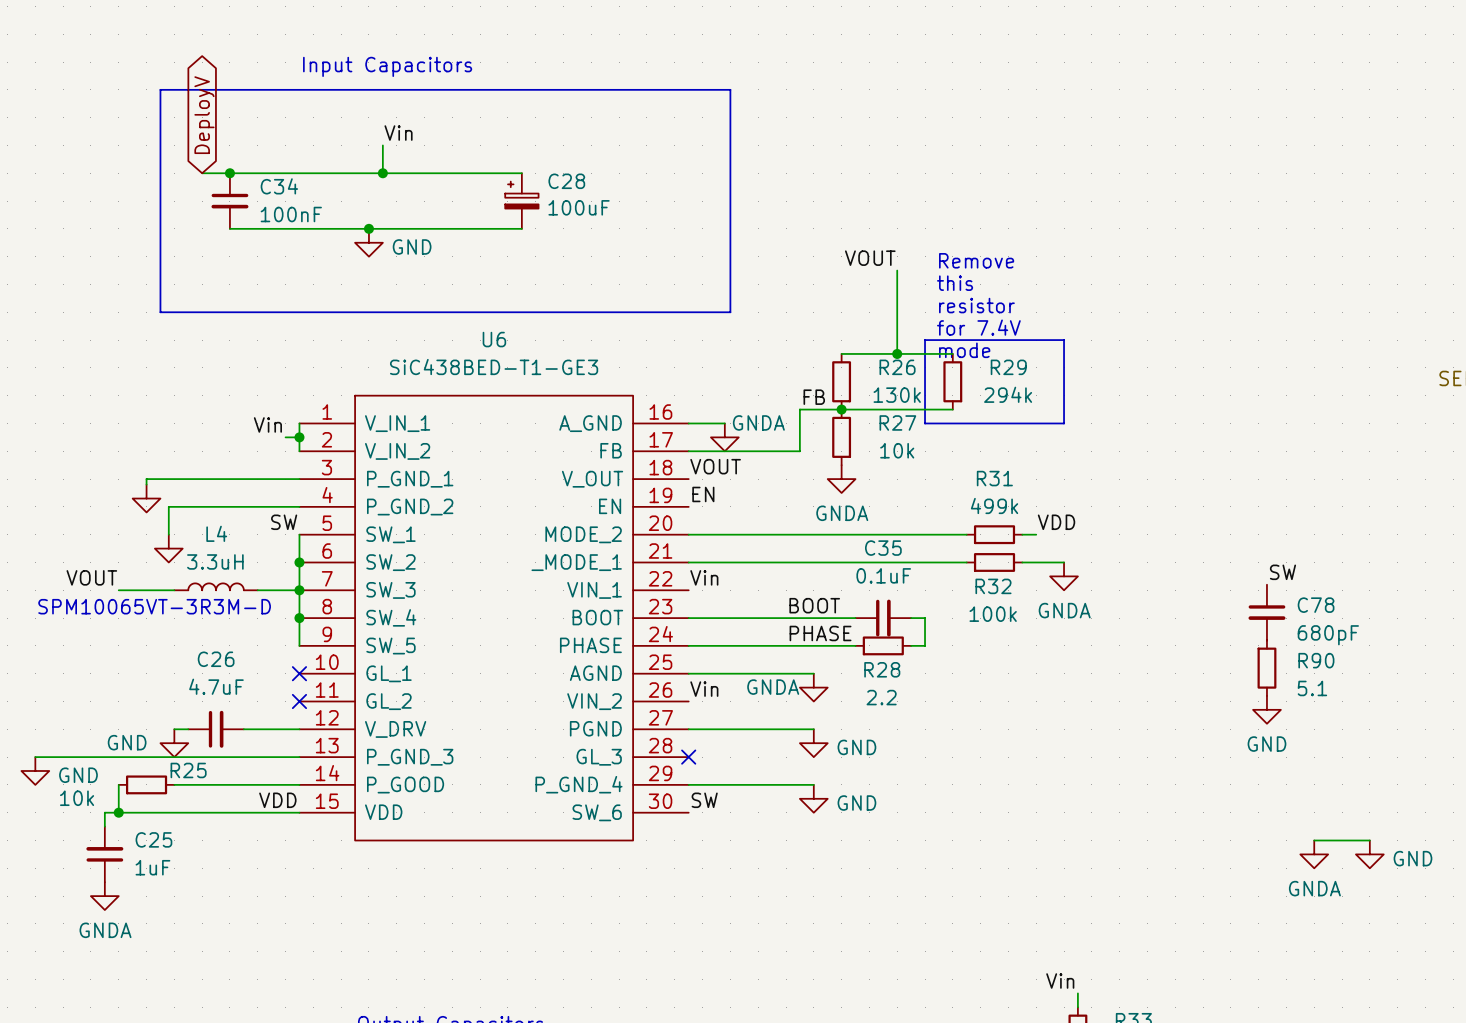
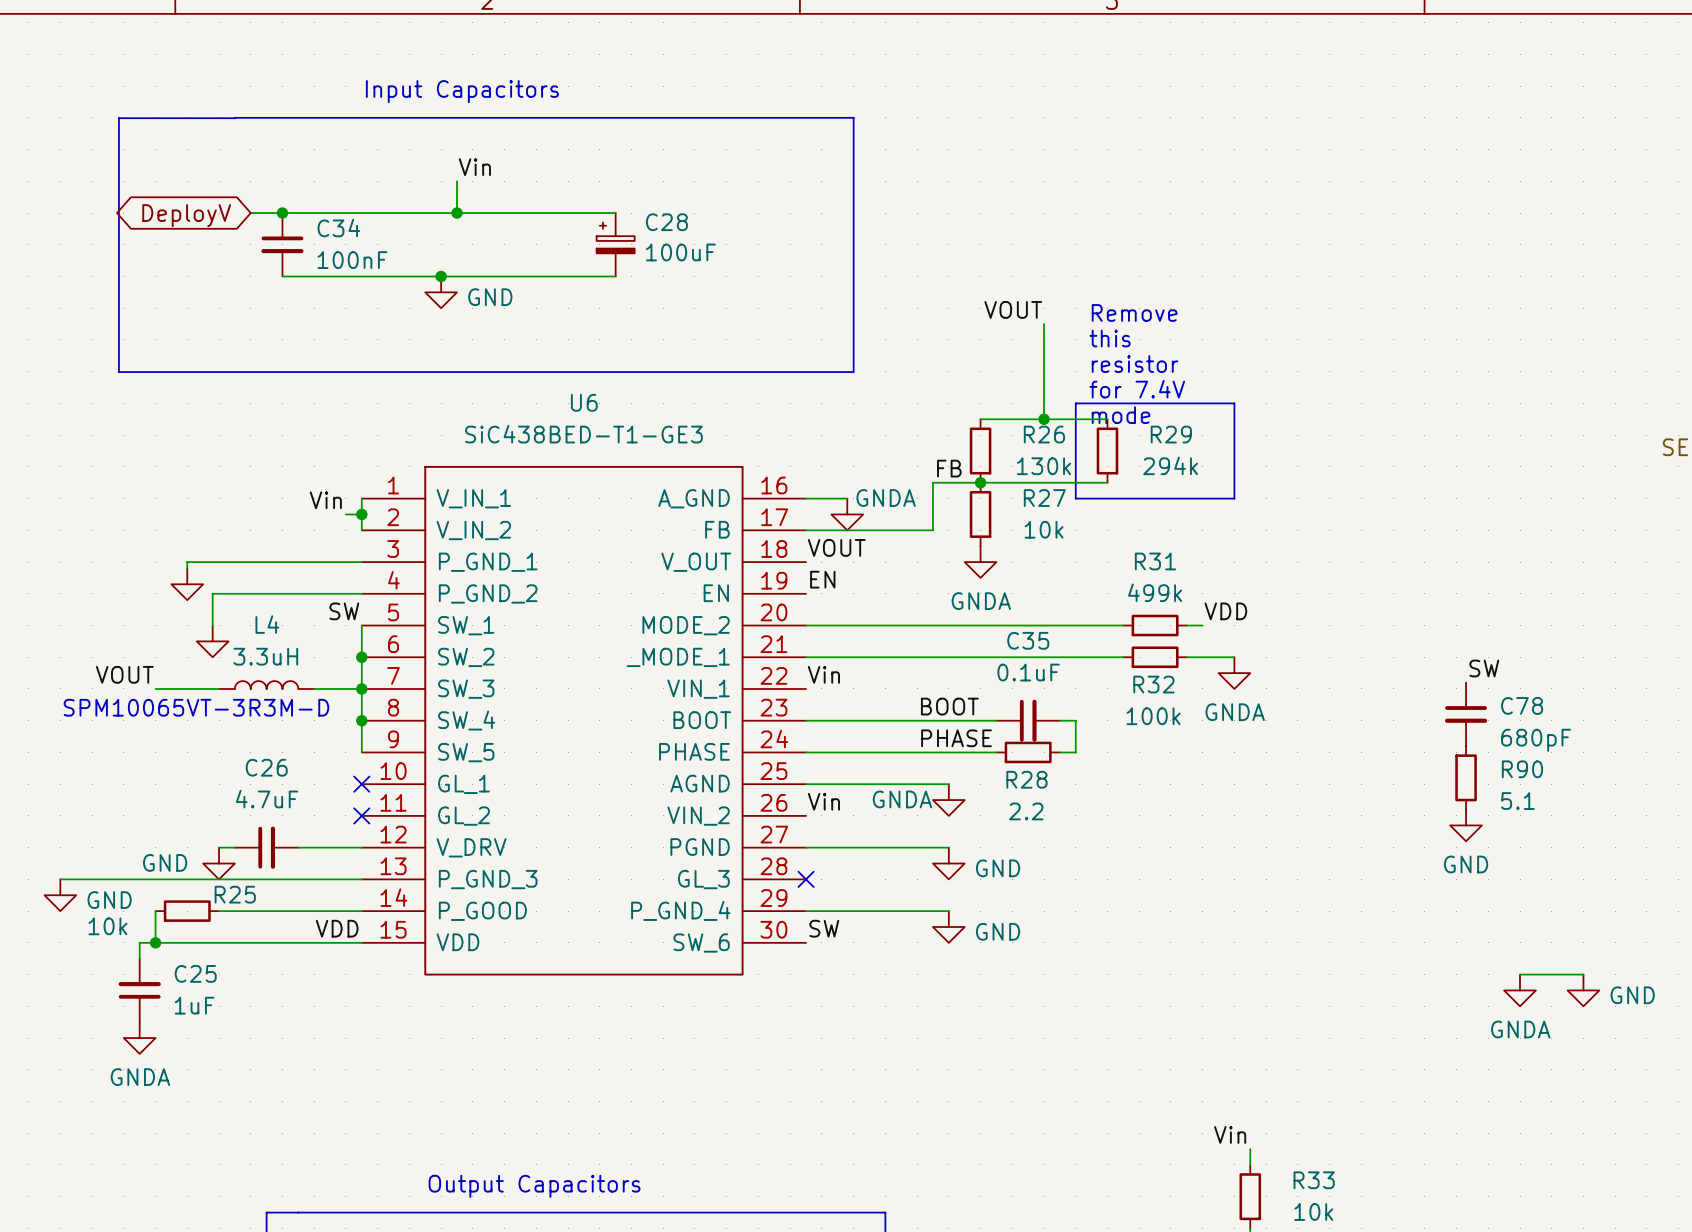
line: (188, 89) (160, 89) (160, 312) (730, 312) -> (234, 118) (118, 118) (118, 372) (853, 372)
global label rotation: 0° (204, 115) -> 90° counterclockwise (186, 215)

